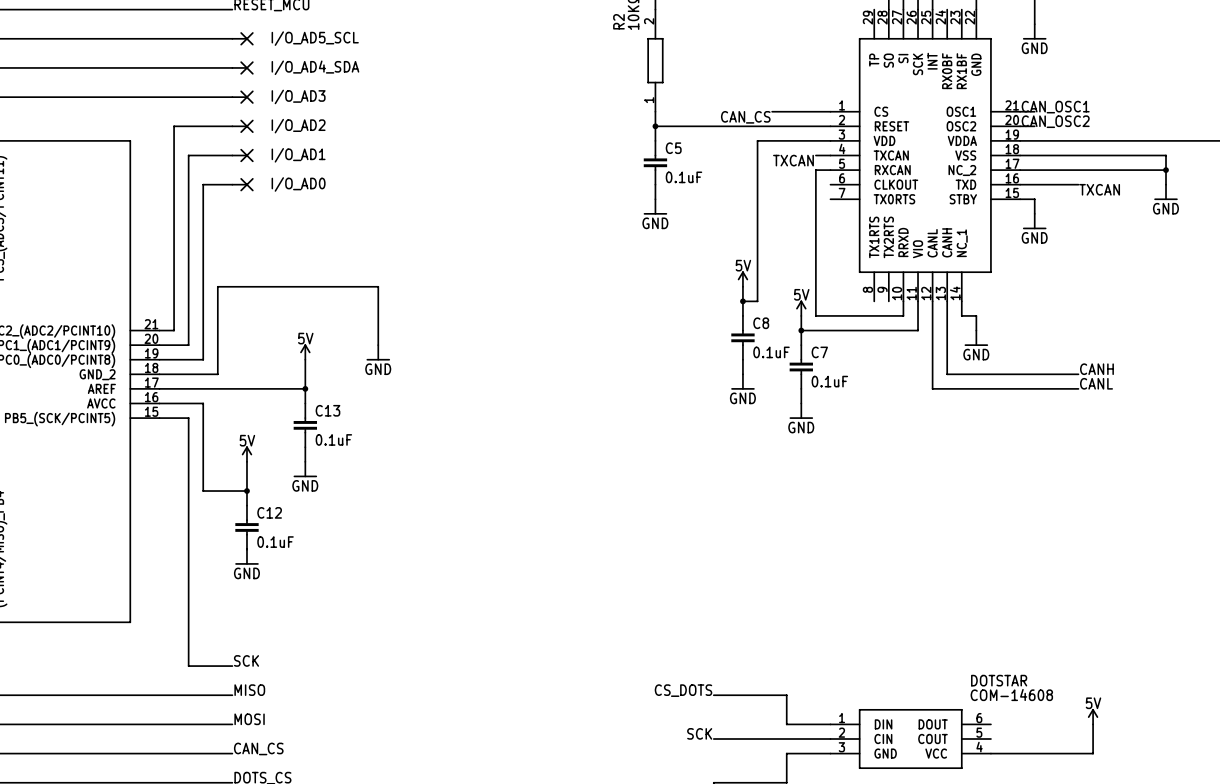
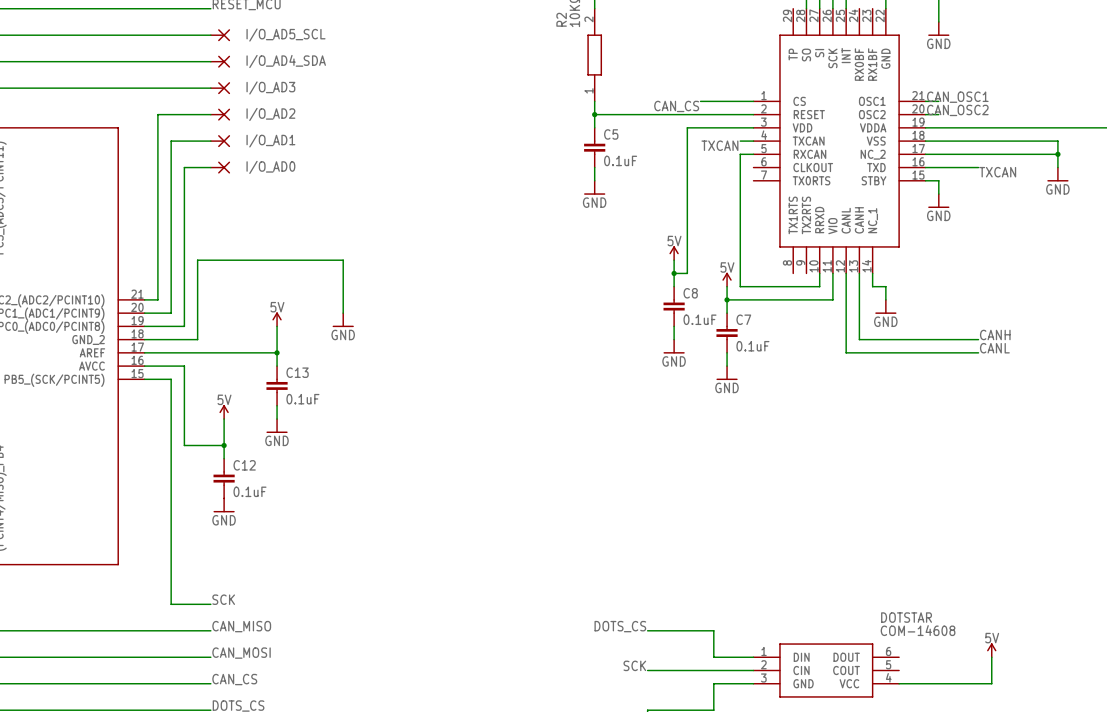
label: MISO (249, 690) -> CAN_MISO (241, 626)
label: CS_DOTS (683, 690) -> DOTS_CS (620, 626)
label: MOSI (249, 719) -> CAN_MOSI (241, 653)

